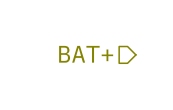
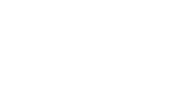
hierarchical label: BAT+ (86, 54) -> none

